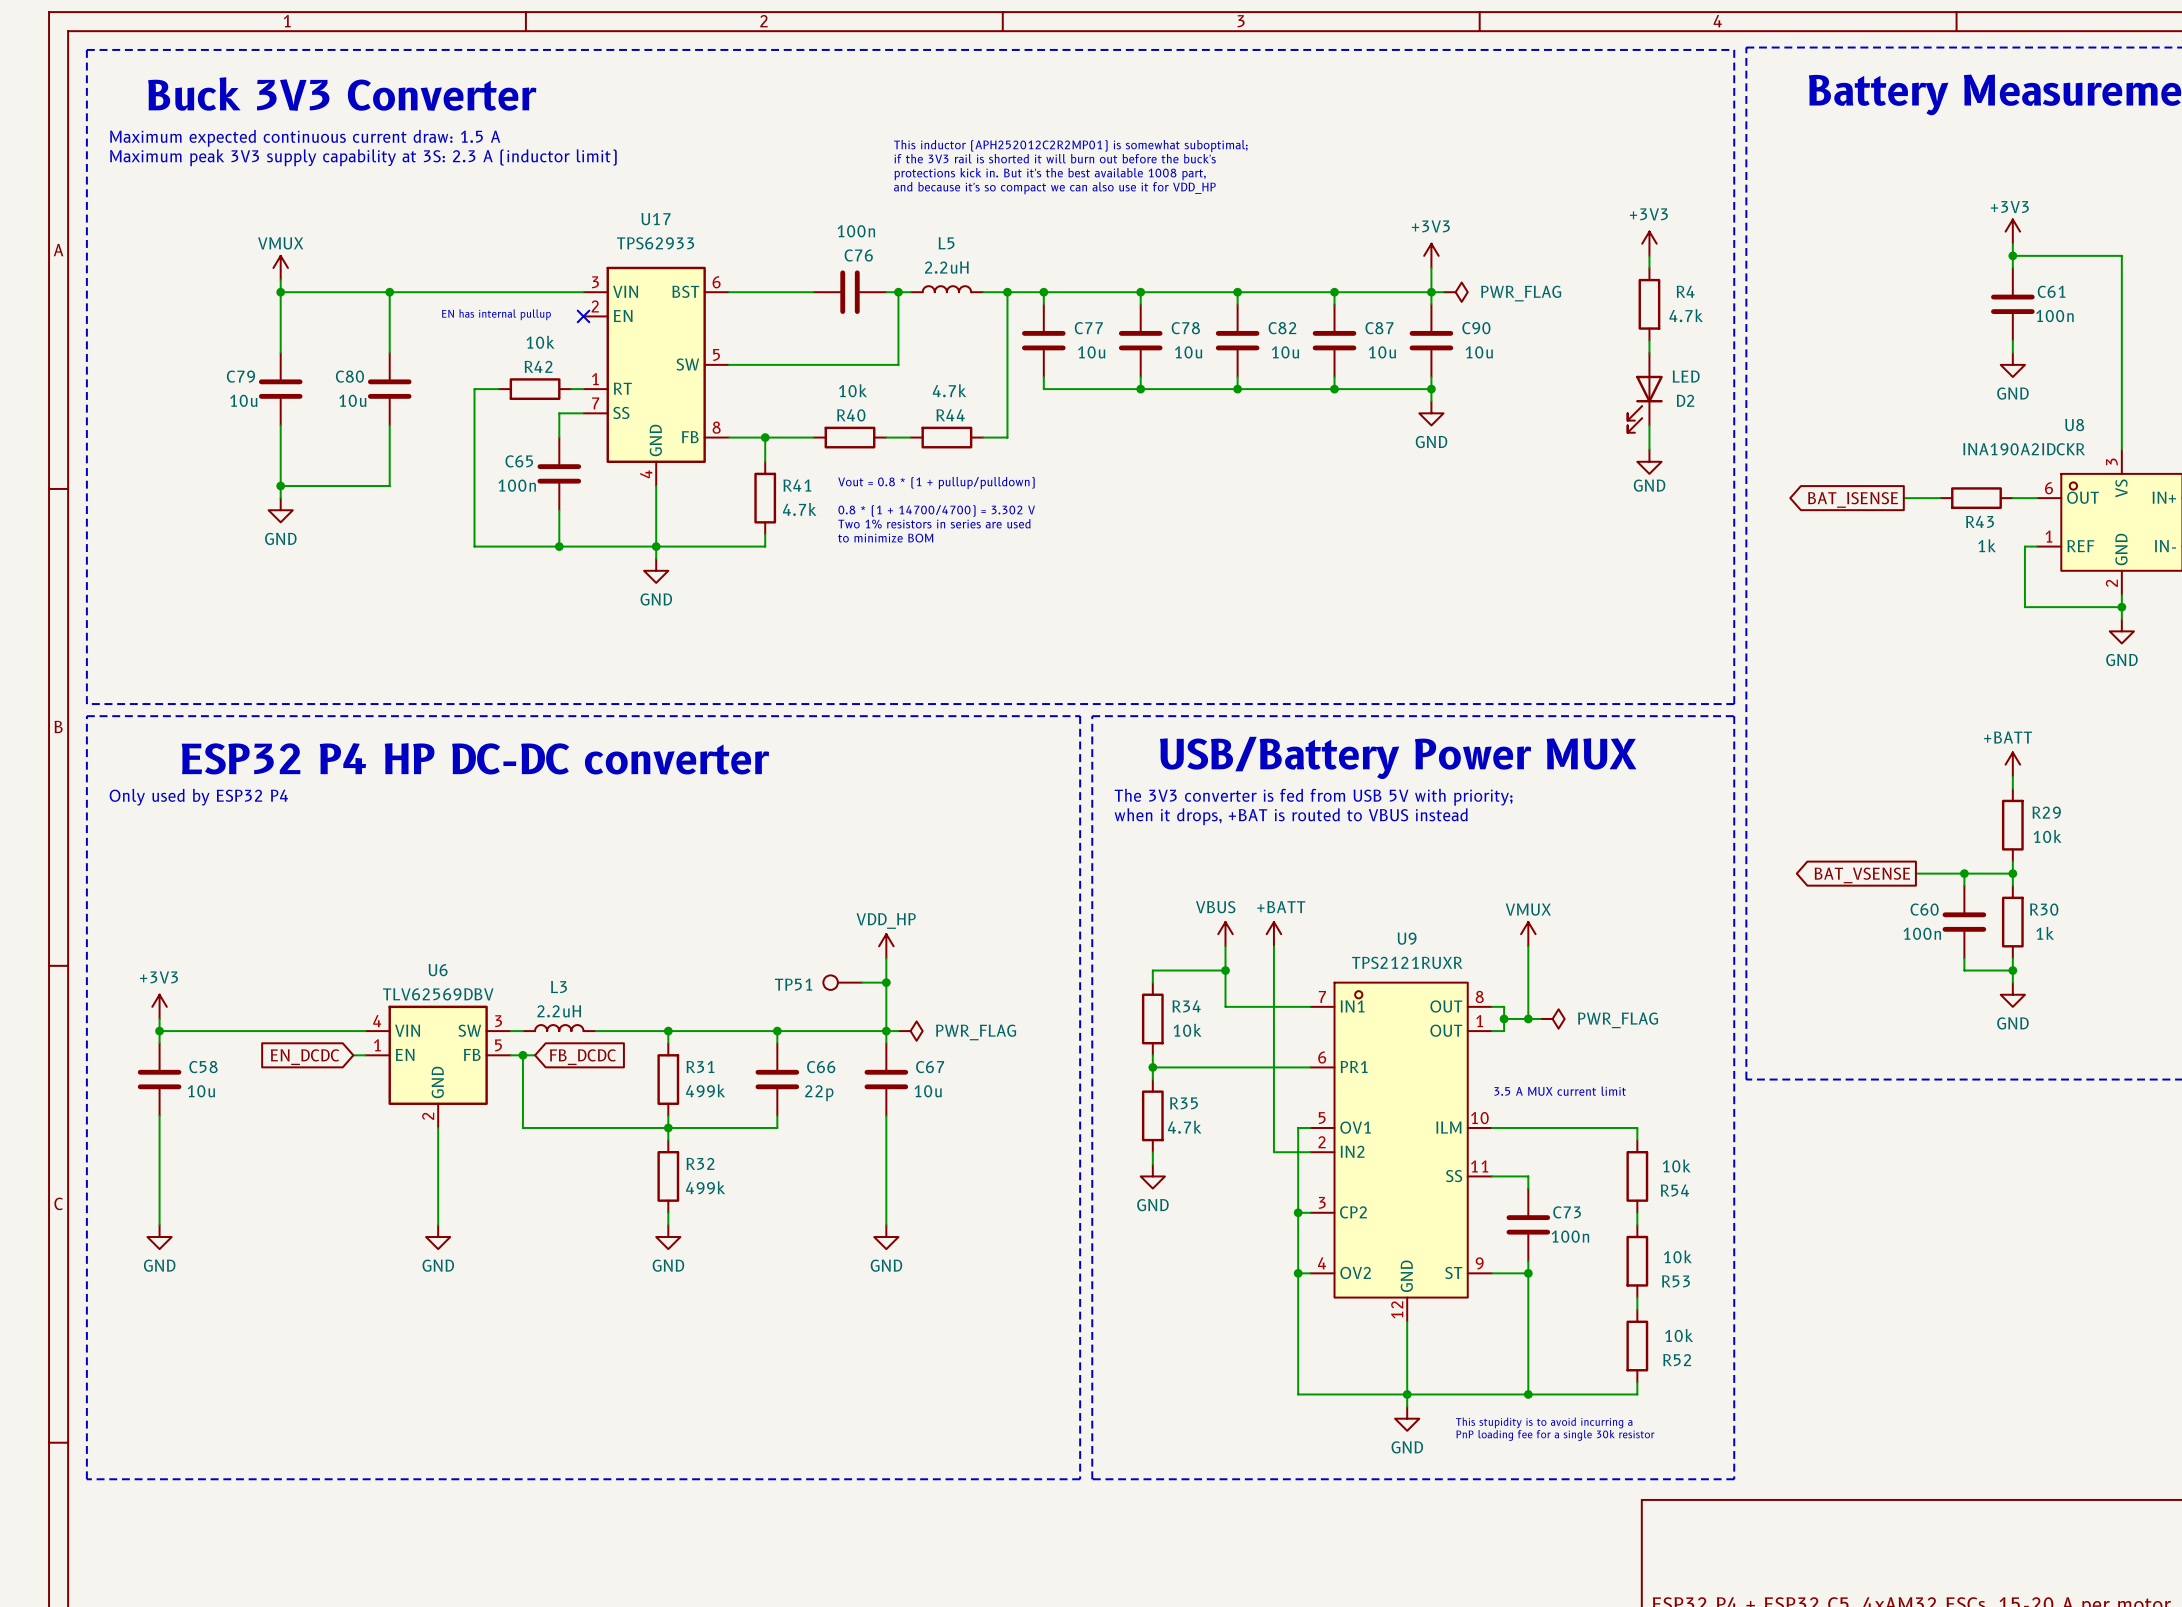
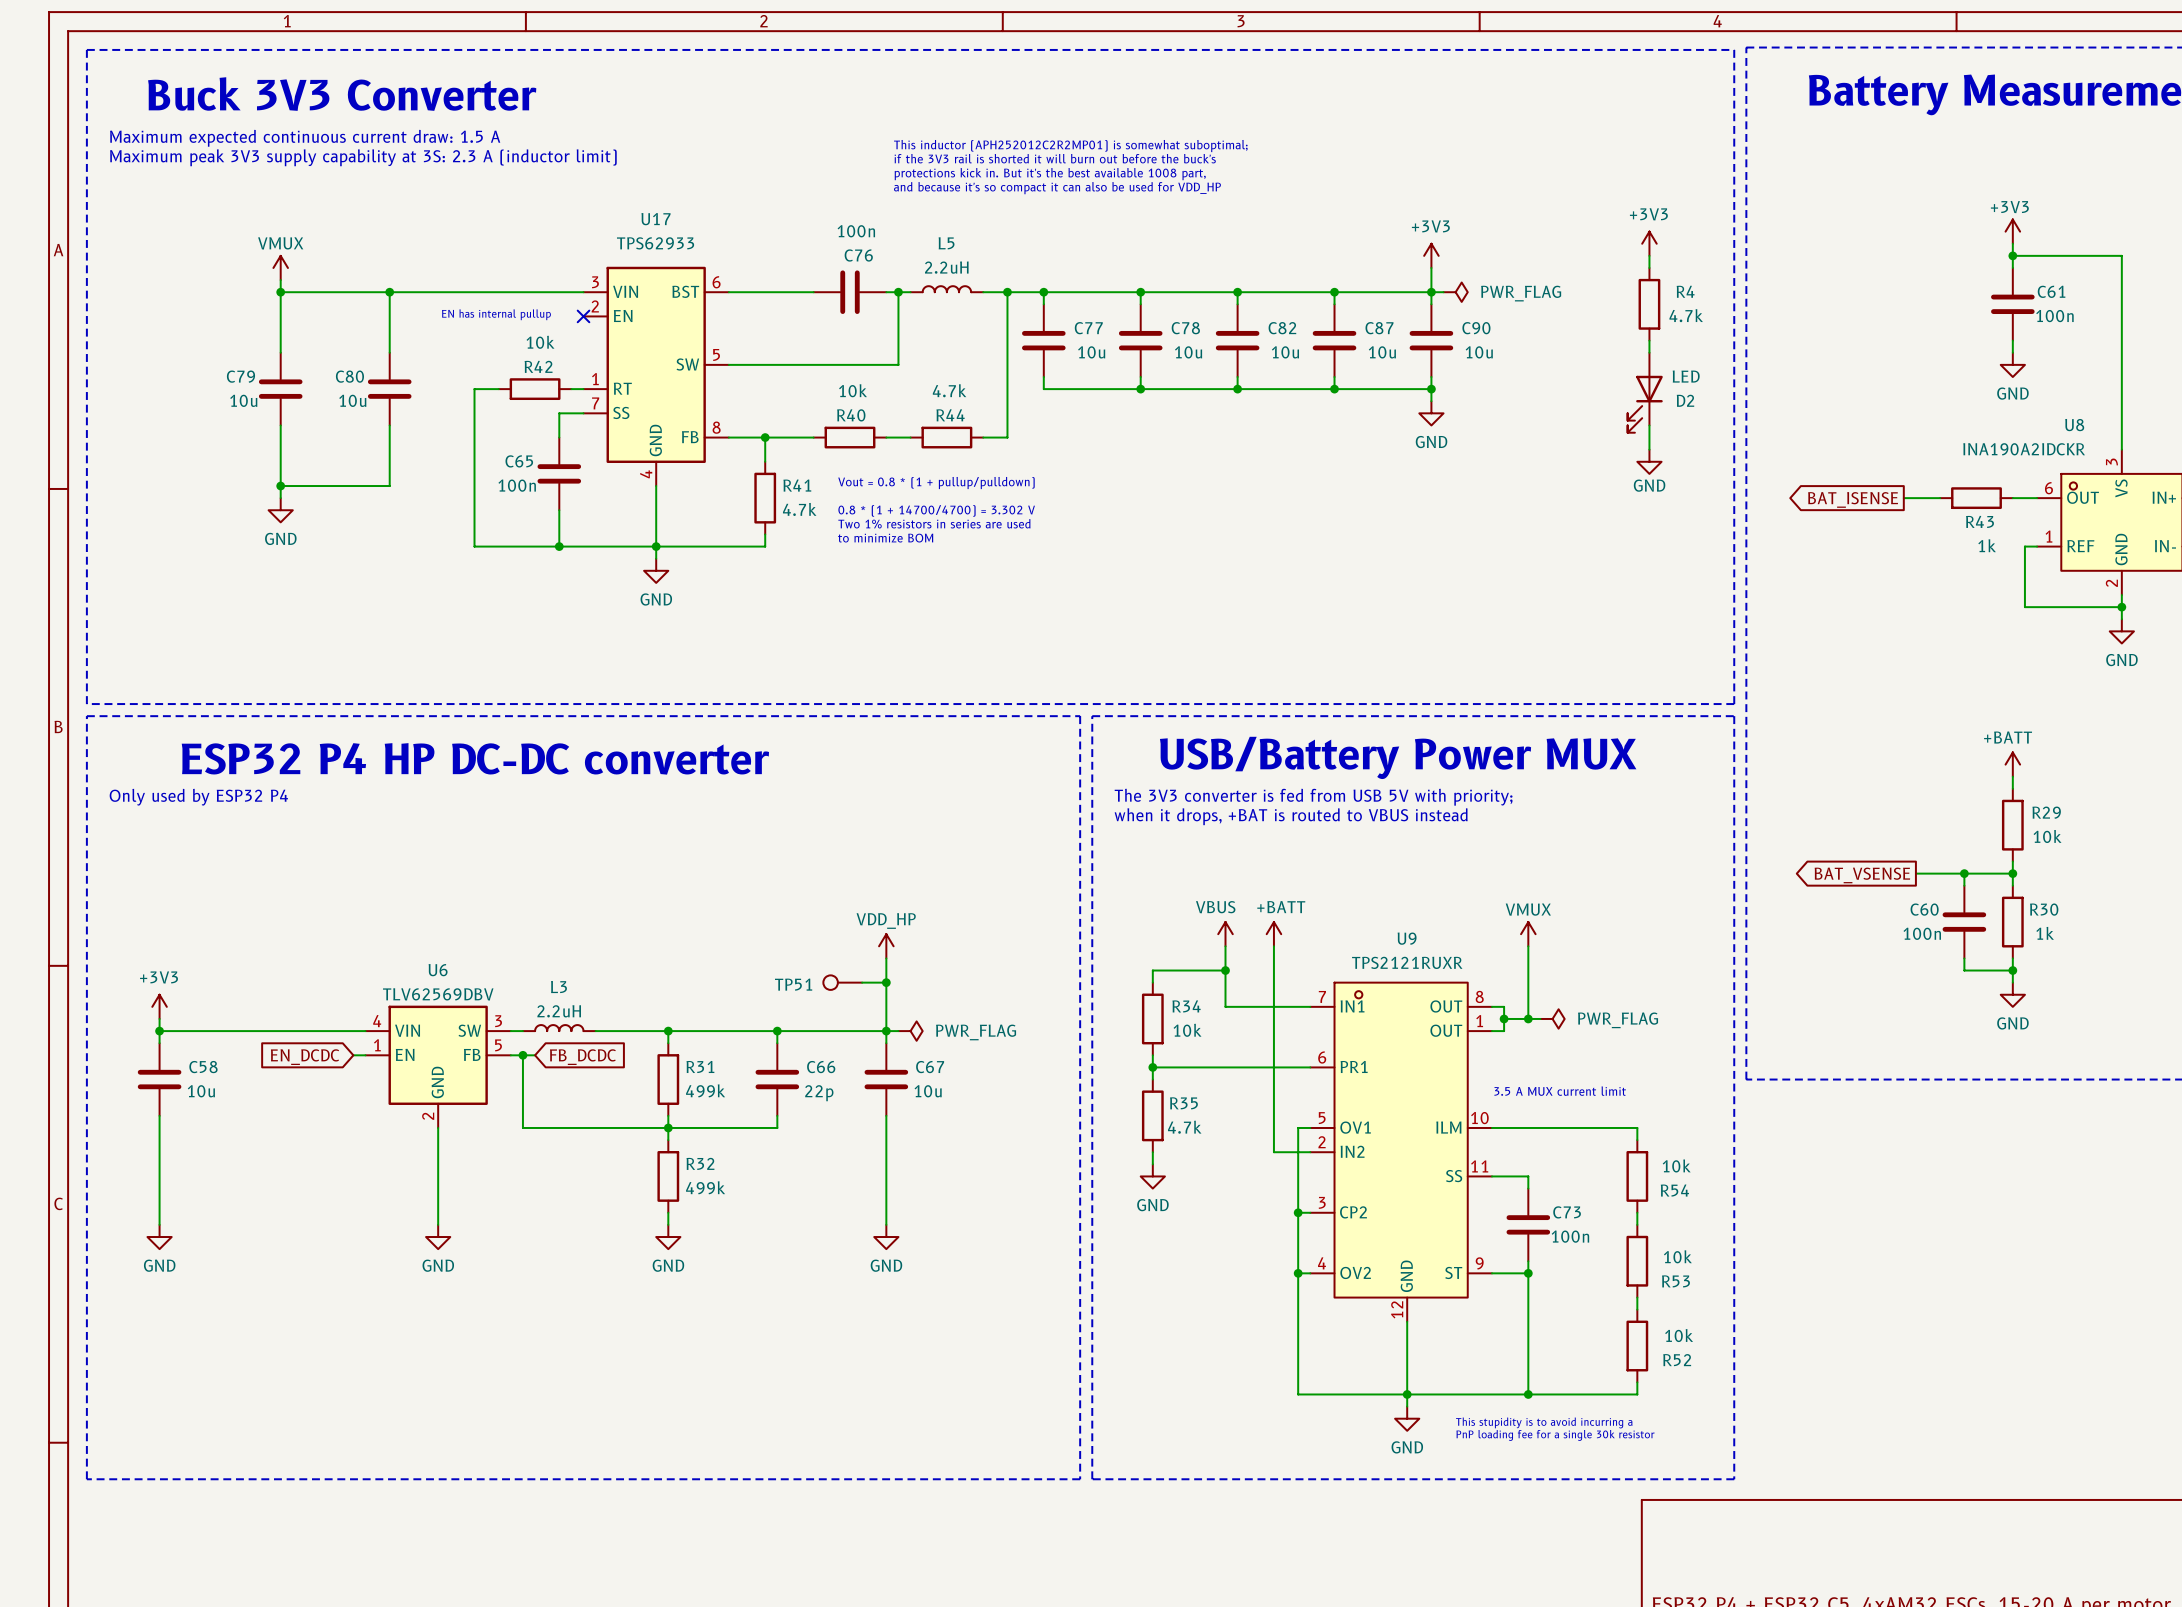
text: and because it's so compact we can also use it for VDD_HP (1054, 188) -> and because it's so compact it can also be used for VDD_HP (1057, 188)

